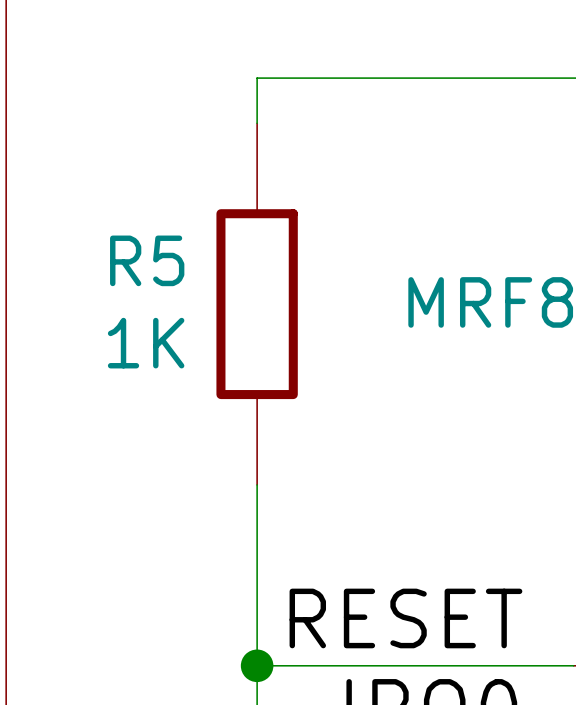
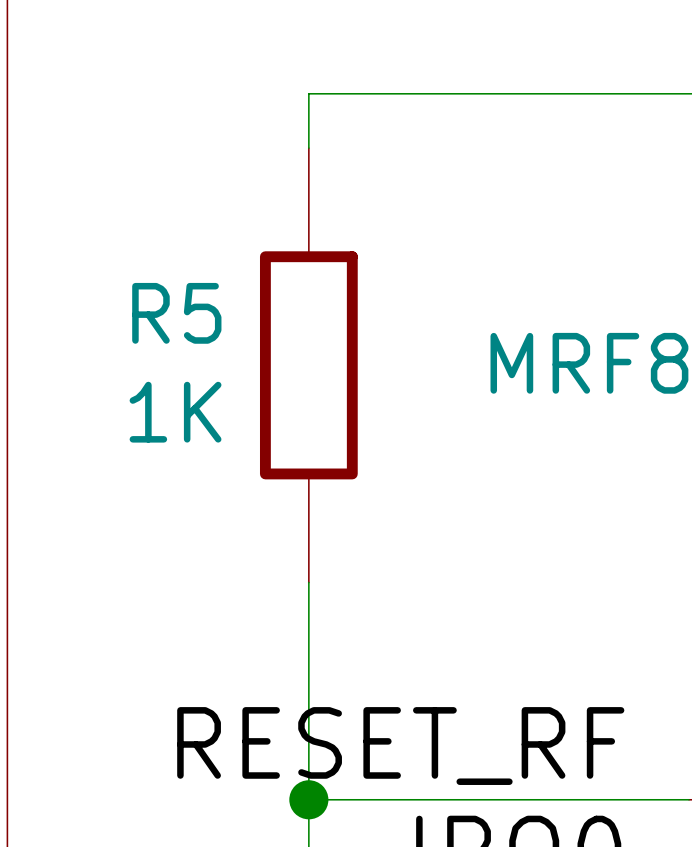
label: RESET (405, 618) -> RESET_RF (400, 746)

